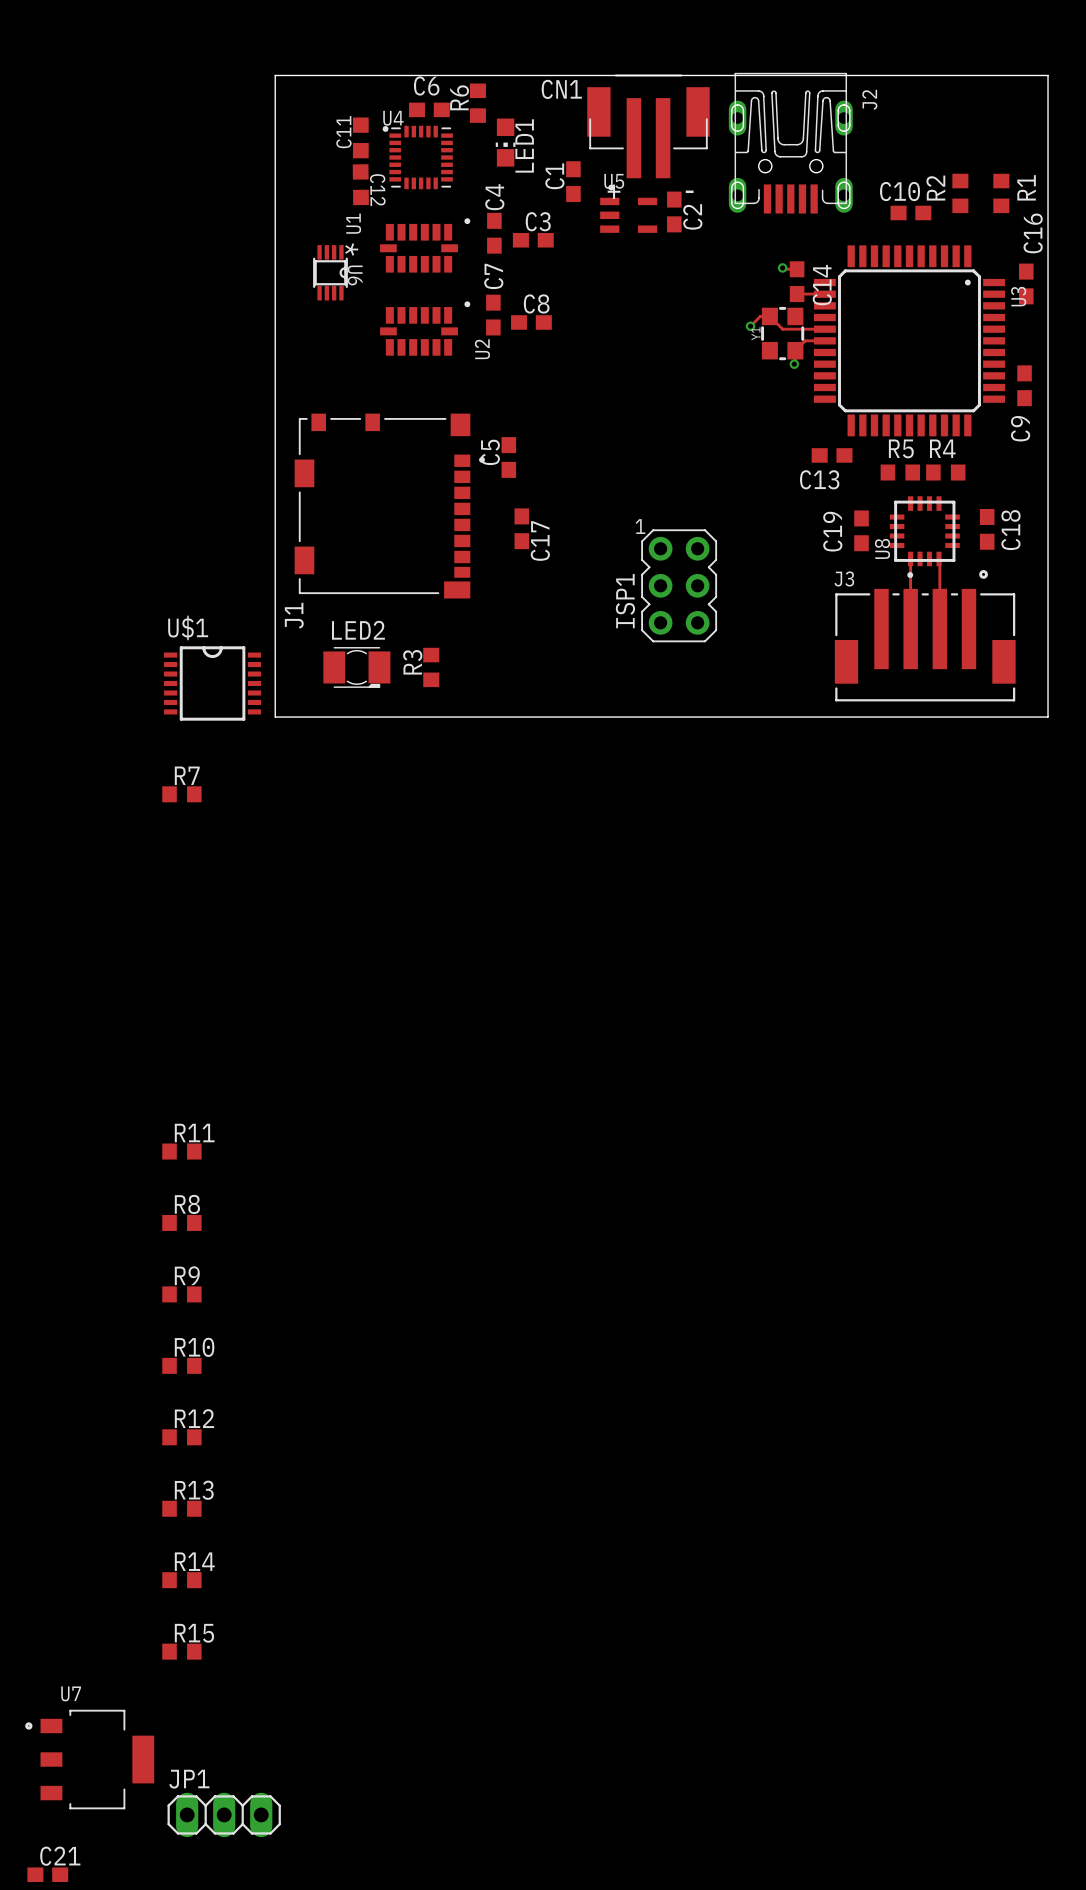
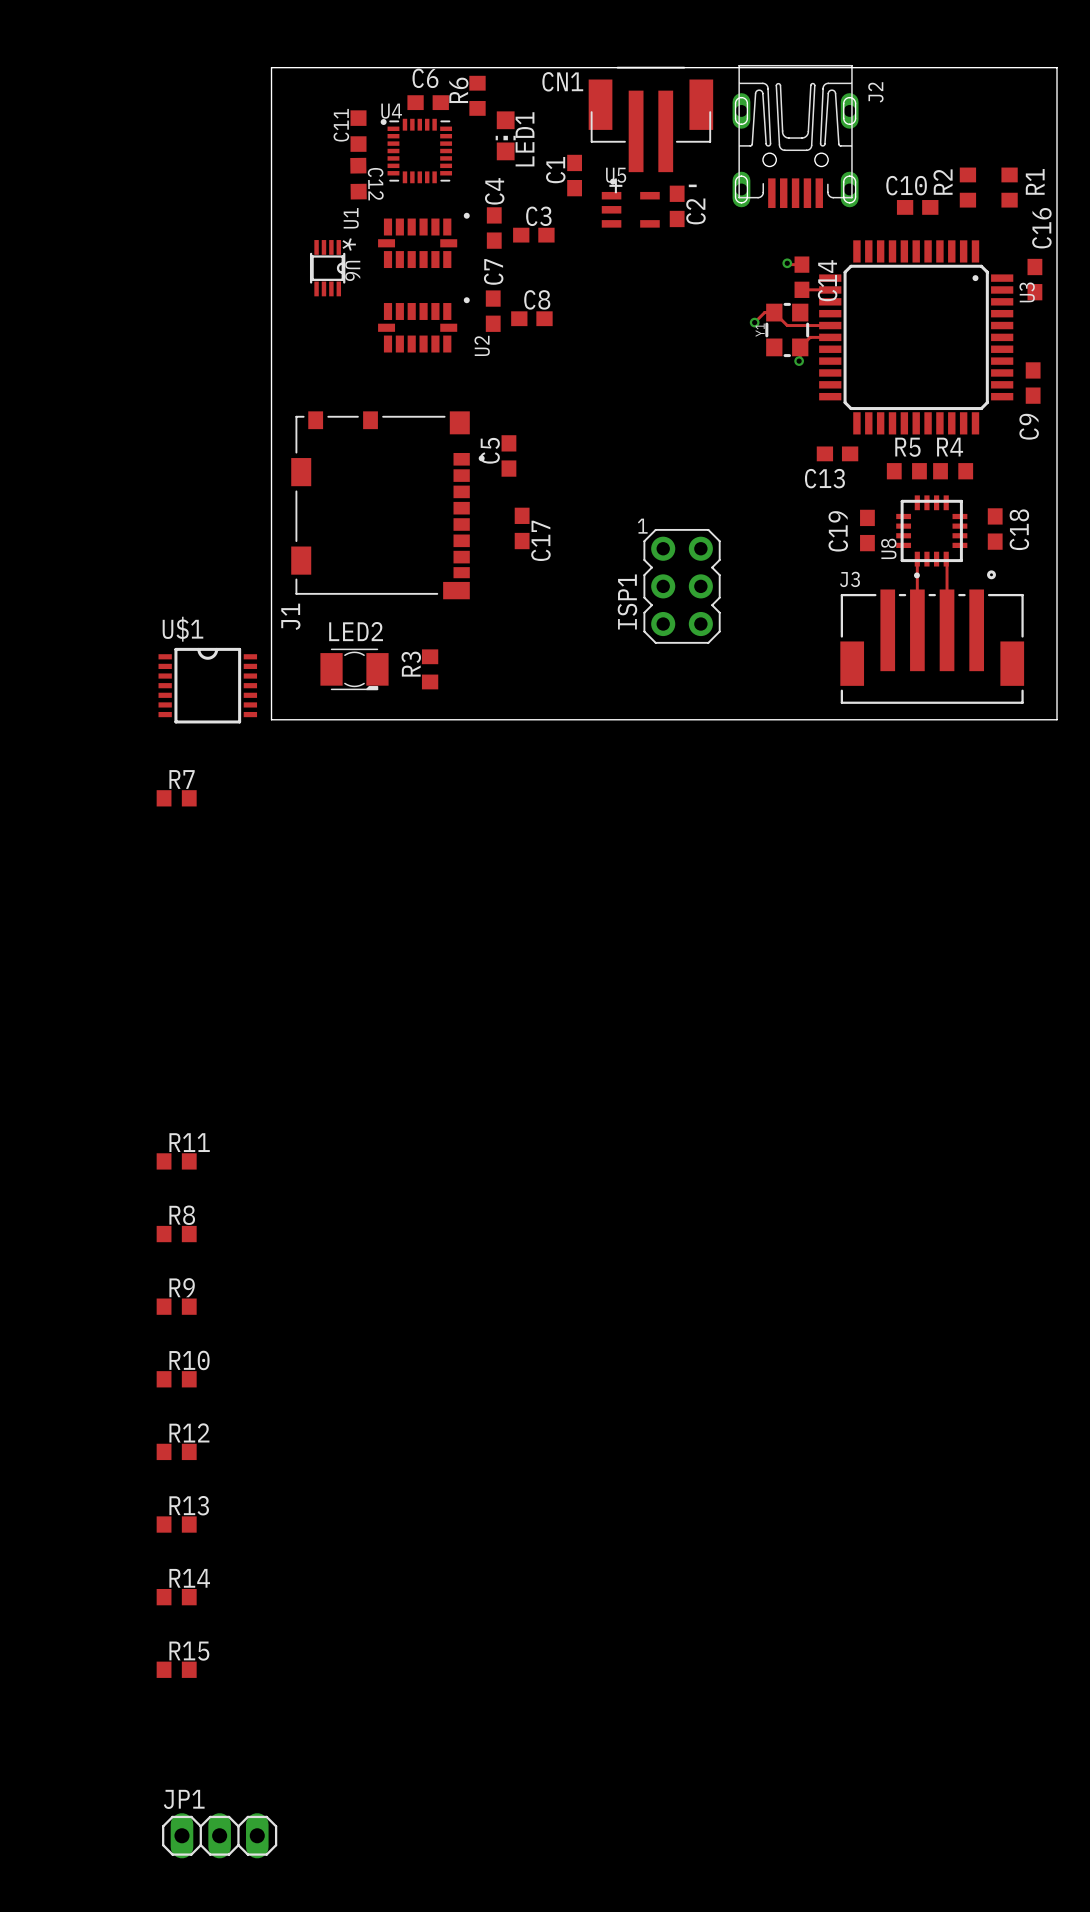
U7: (89, 1759) -> none
C21: (47, 1874) -> none

